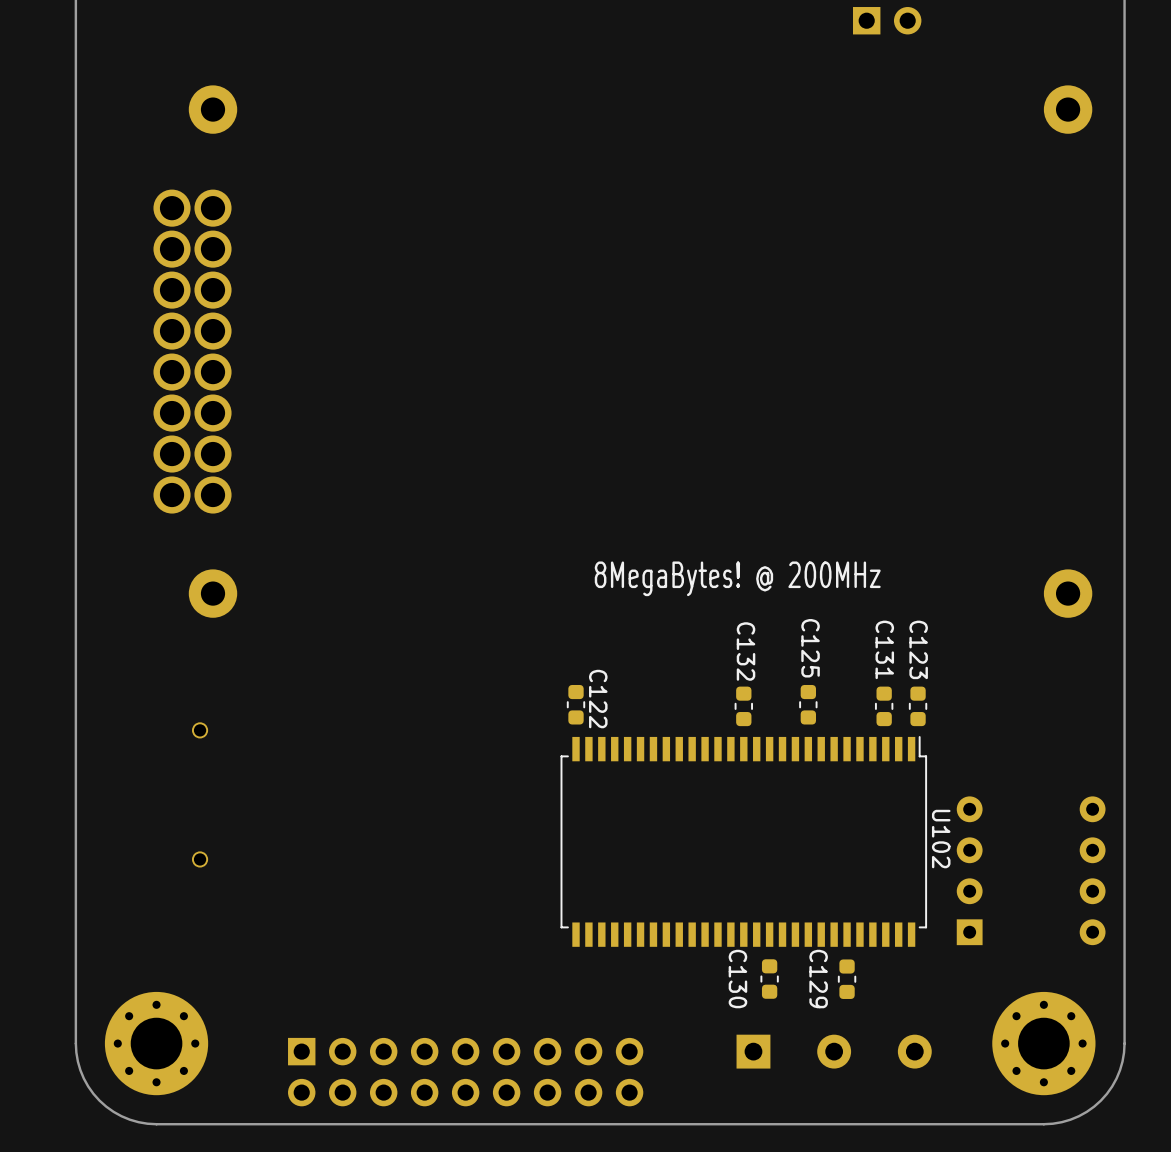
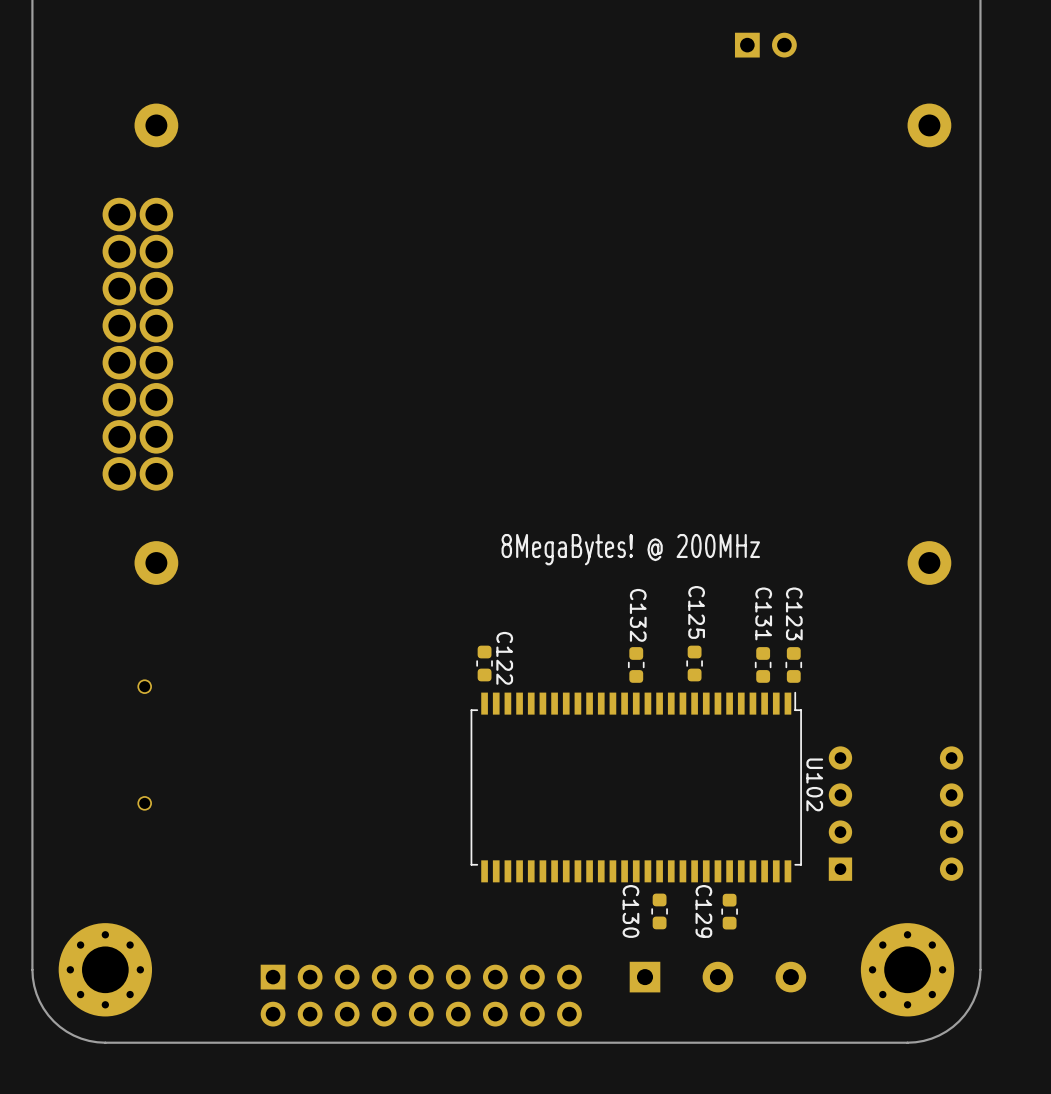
part position: (465, 1072) -> (421, 995)

